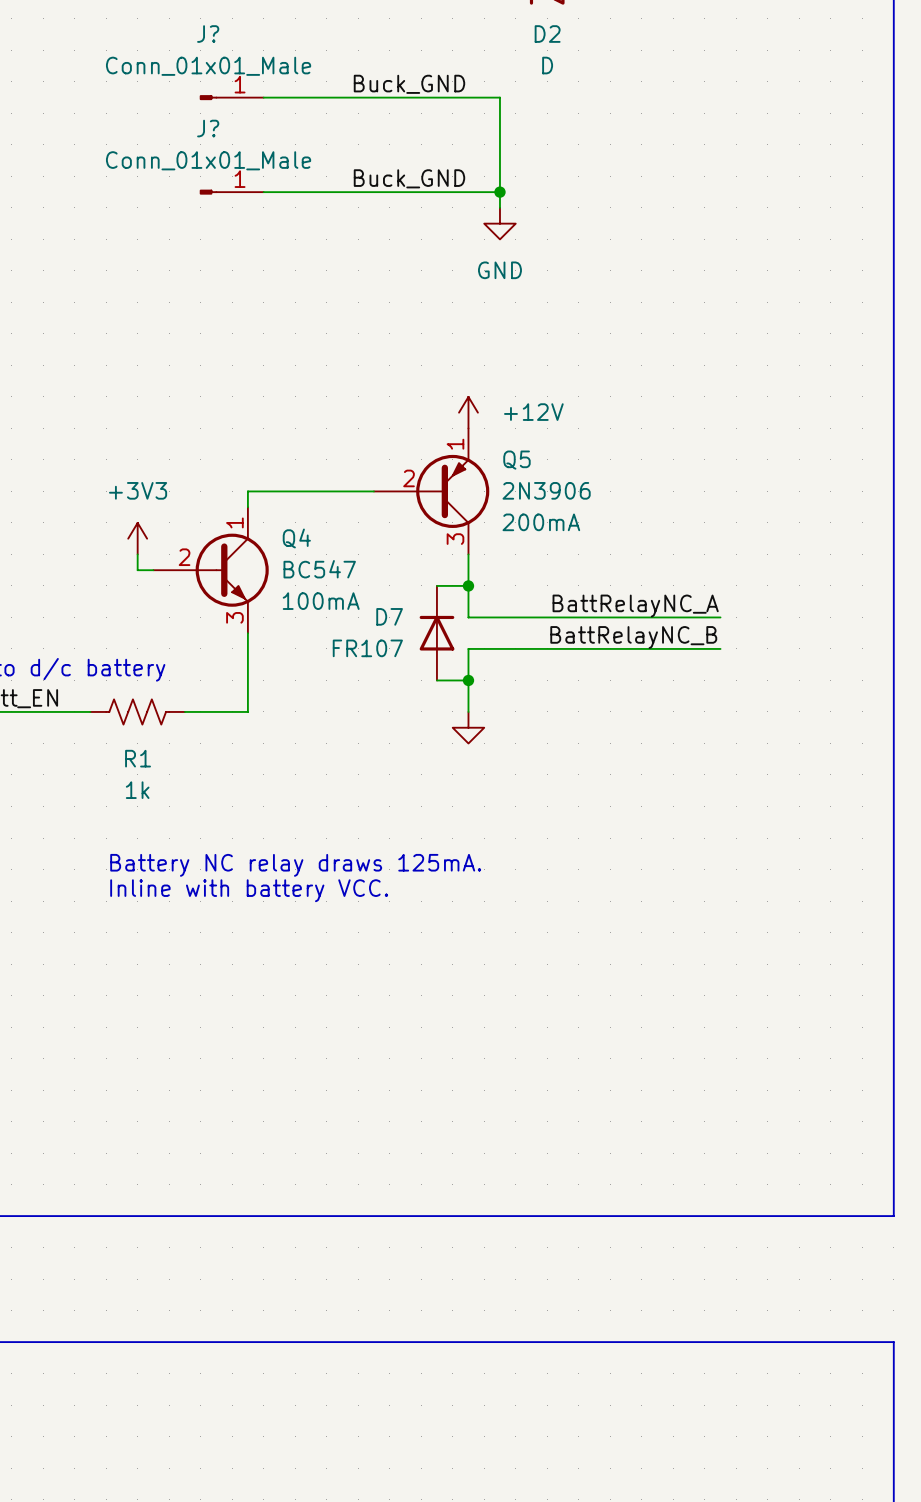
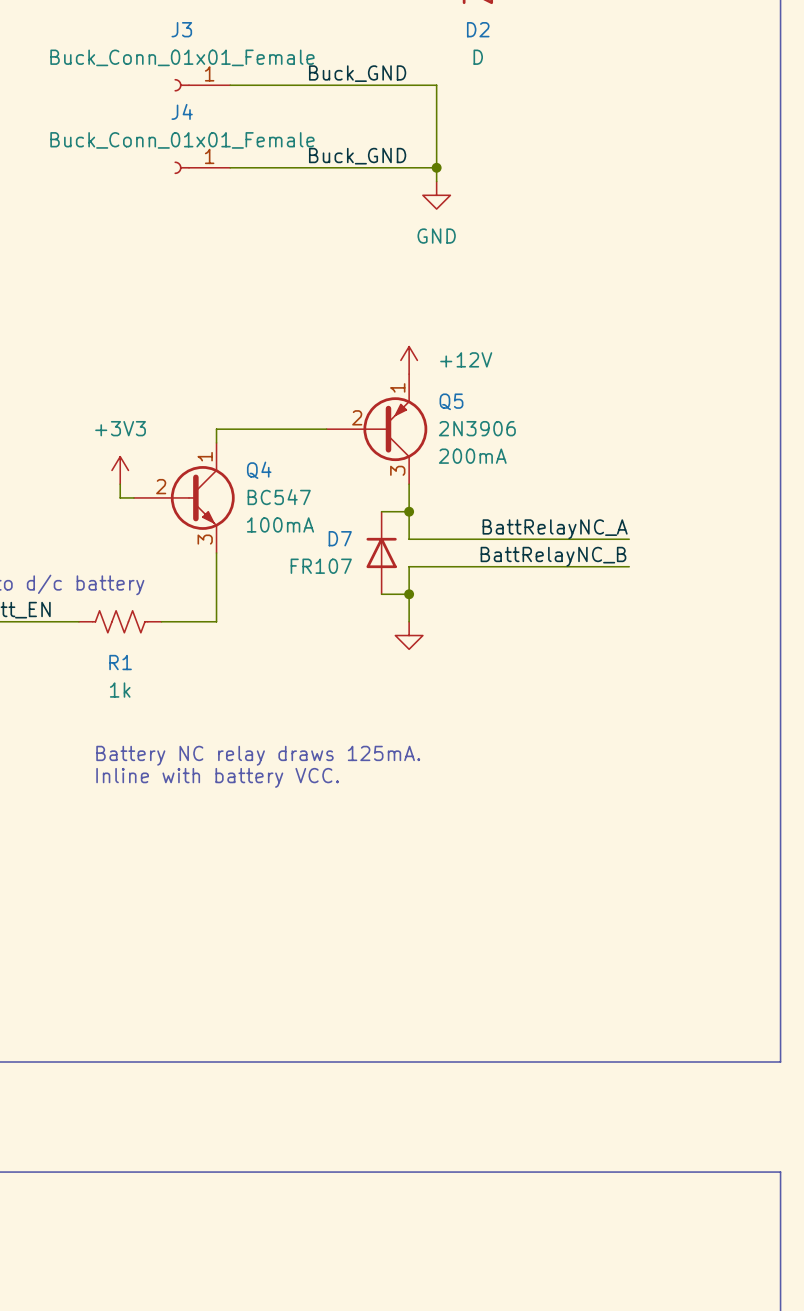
J?: Conn_01x01_Male (231, 97) -> none
J3: none -> Buck_Conn_01x01_Female (202, 85)
J?: Conn_01x01_Male (231, 192) -> none
J4: none -> Buck_Conn_01x01_Female (202, 167)

